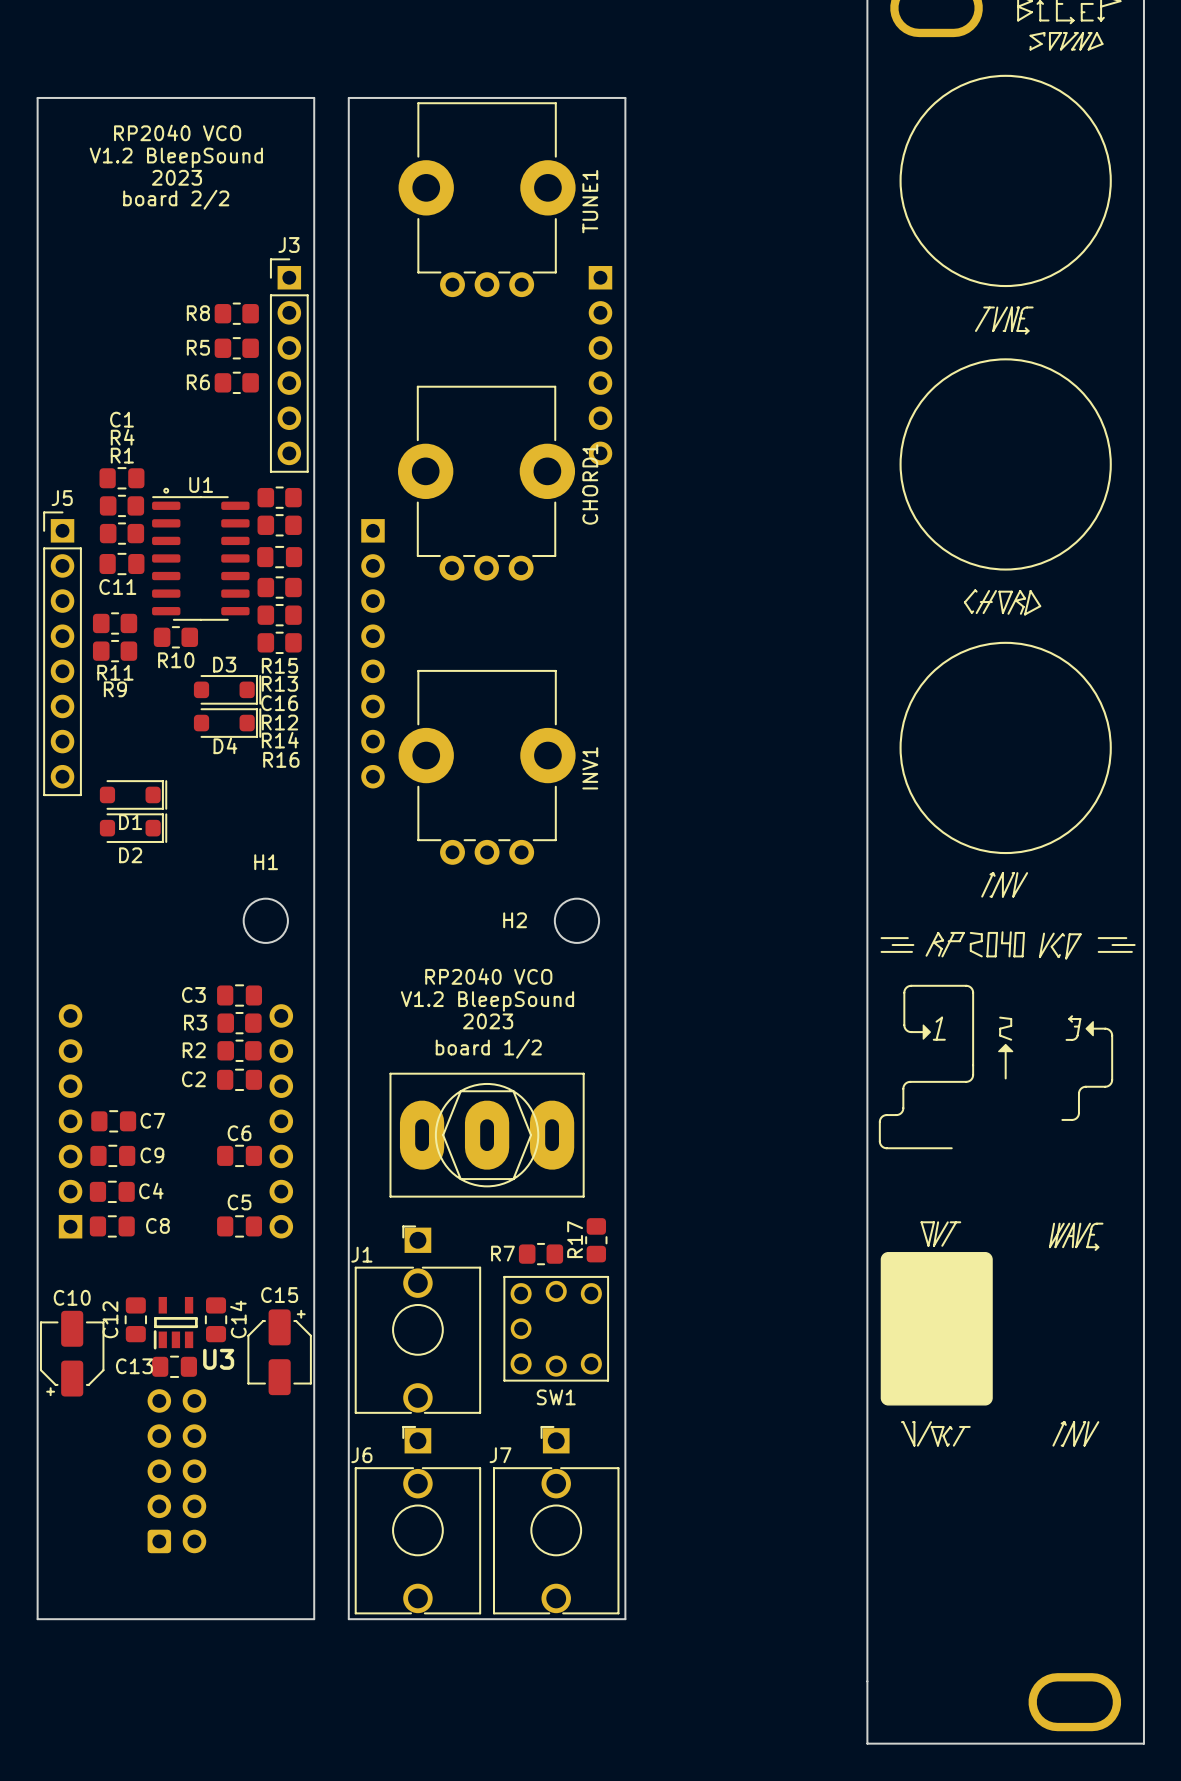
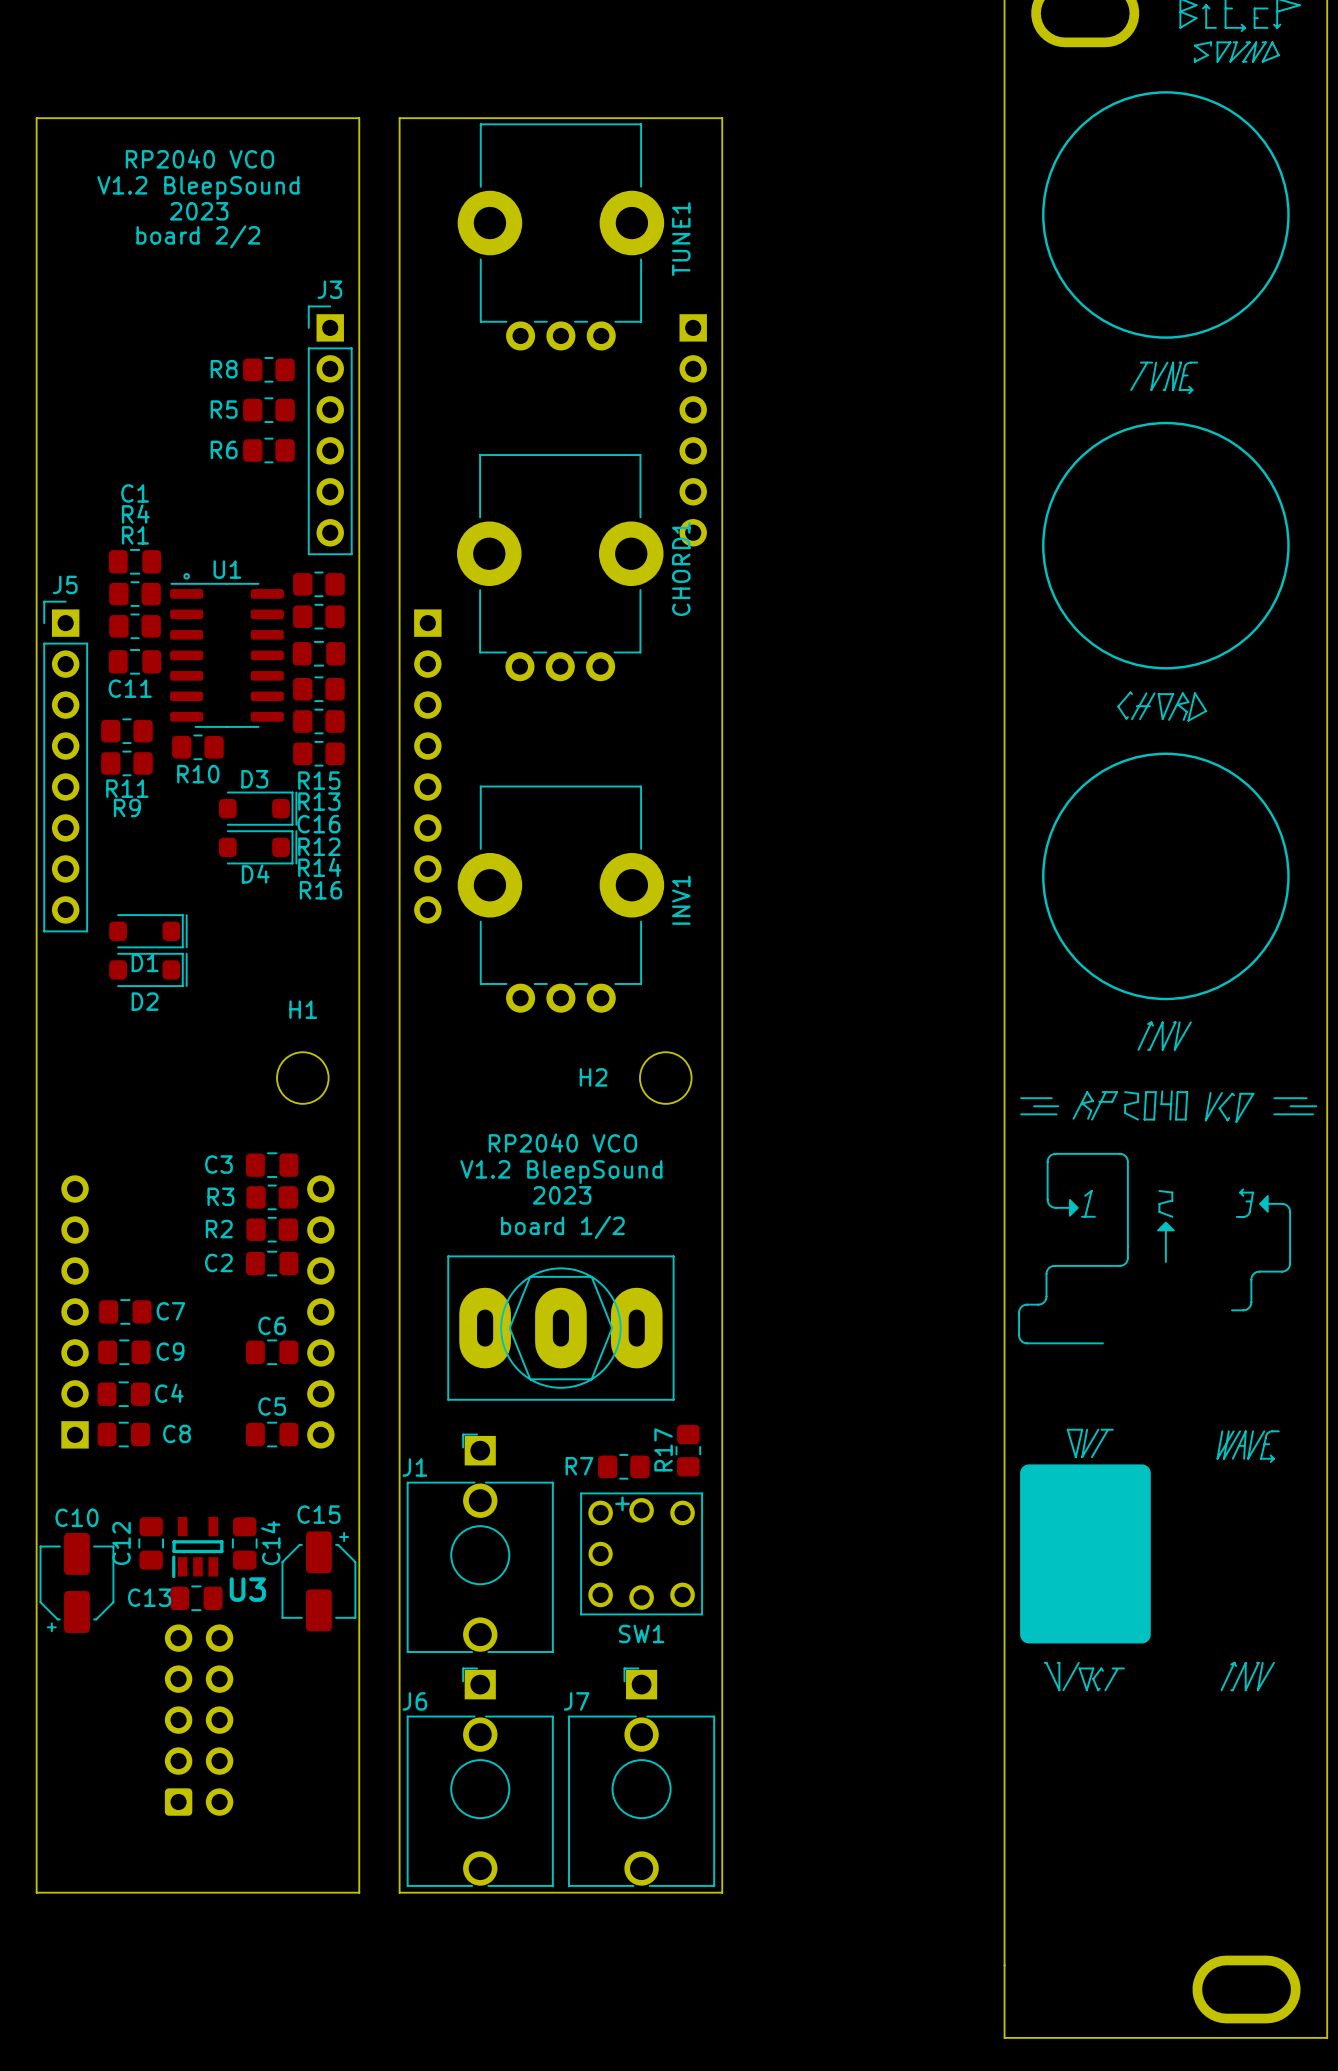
SW1 text: none -> + (622, 1503)

